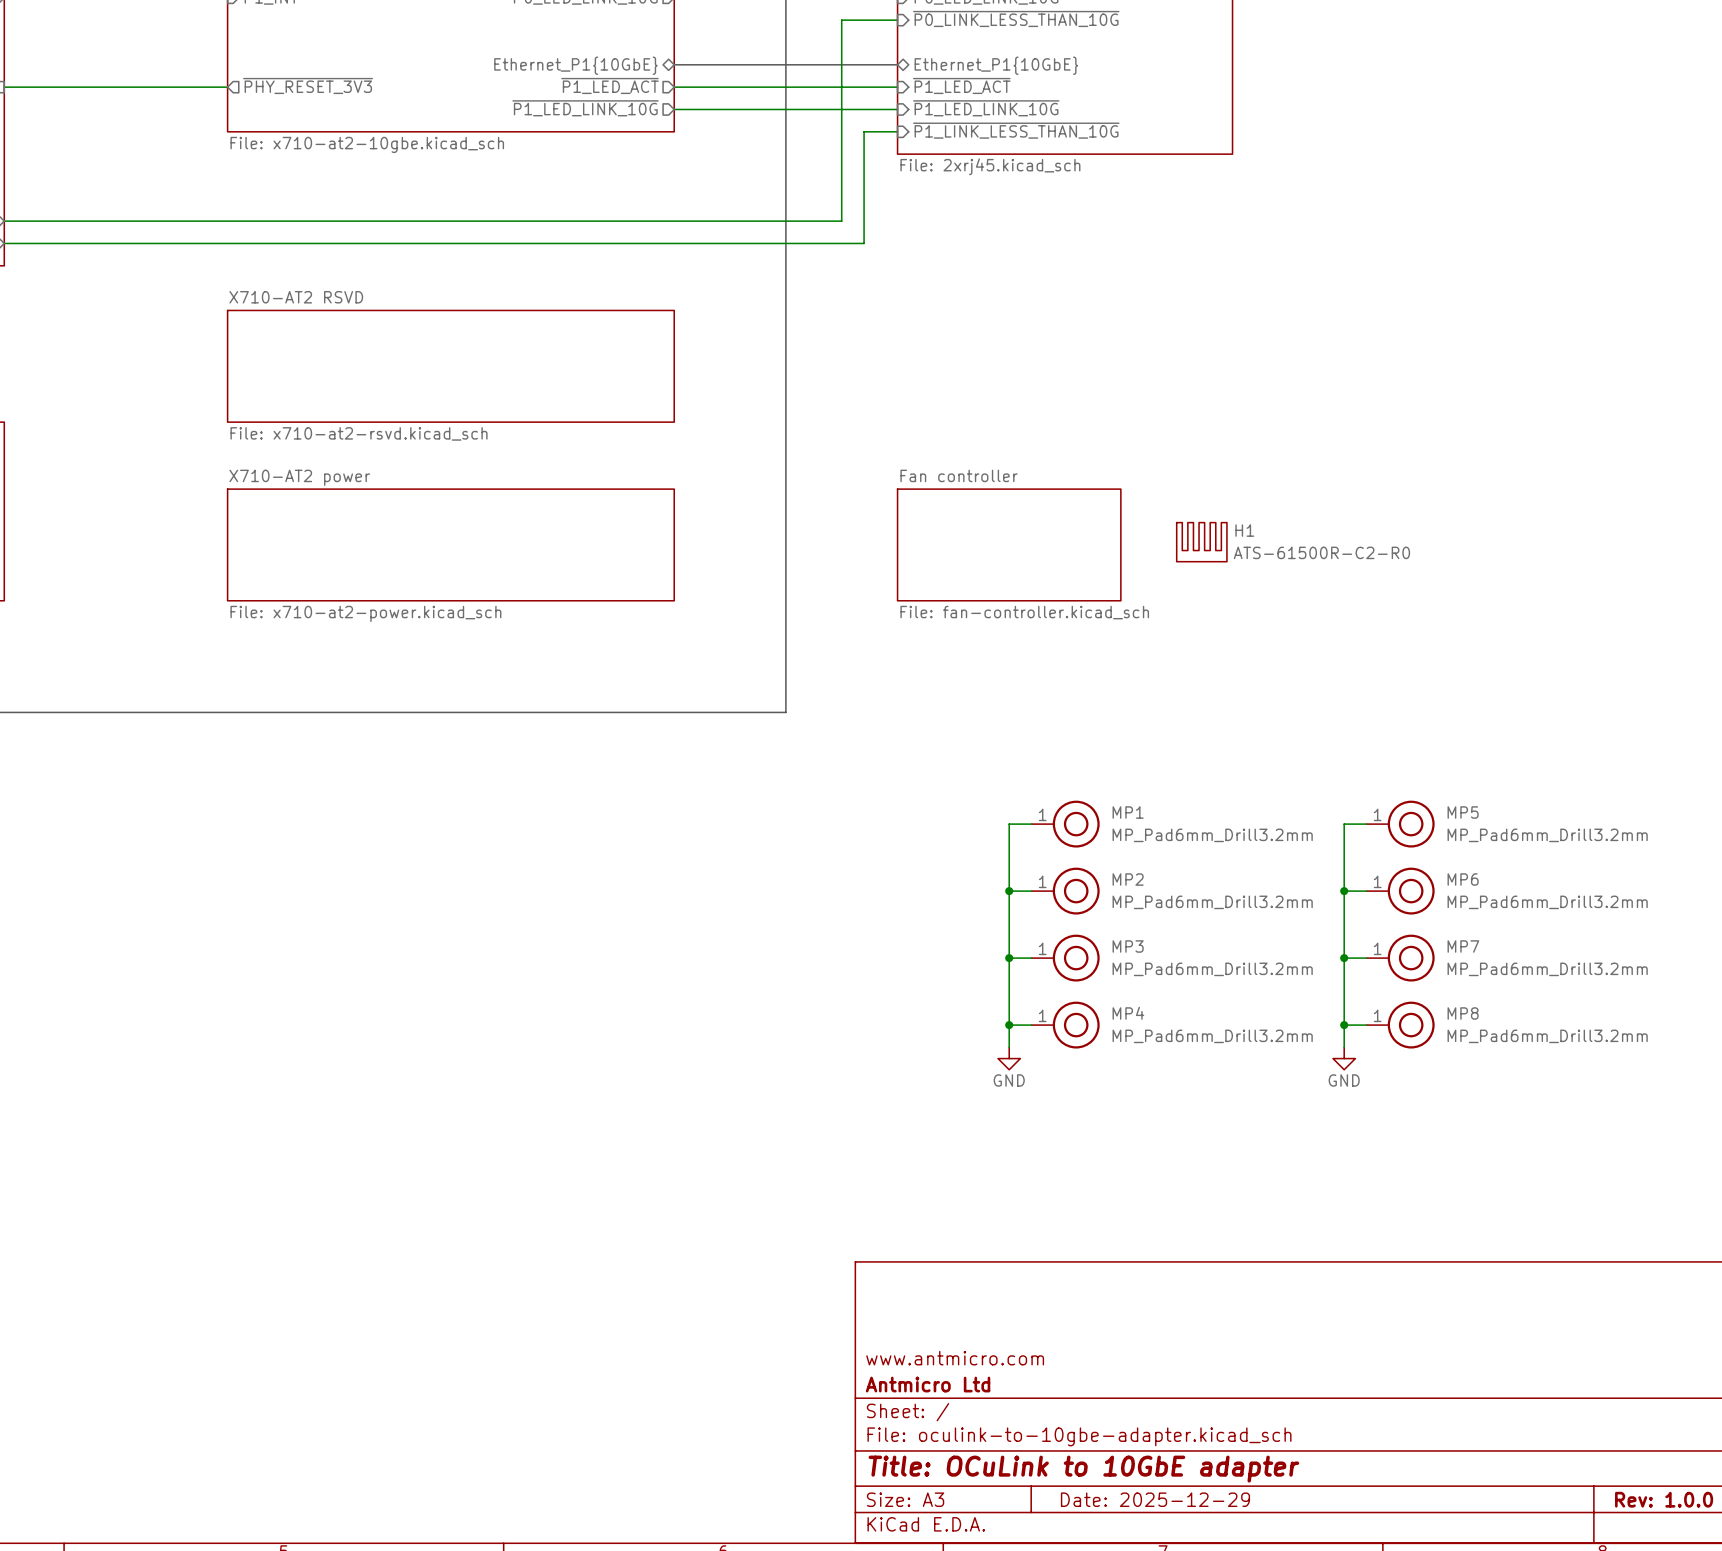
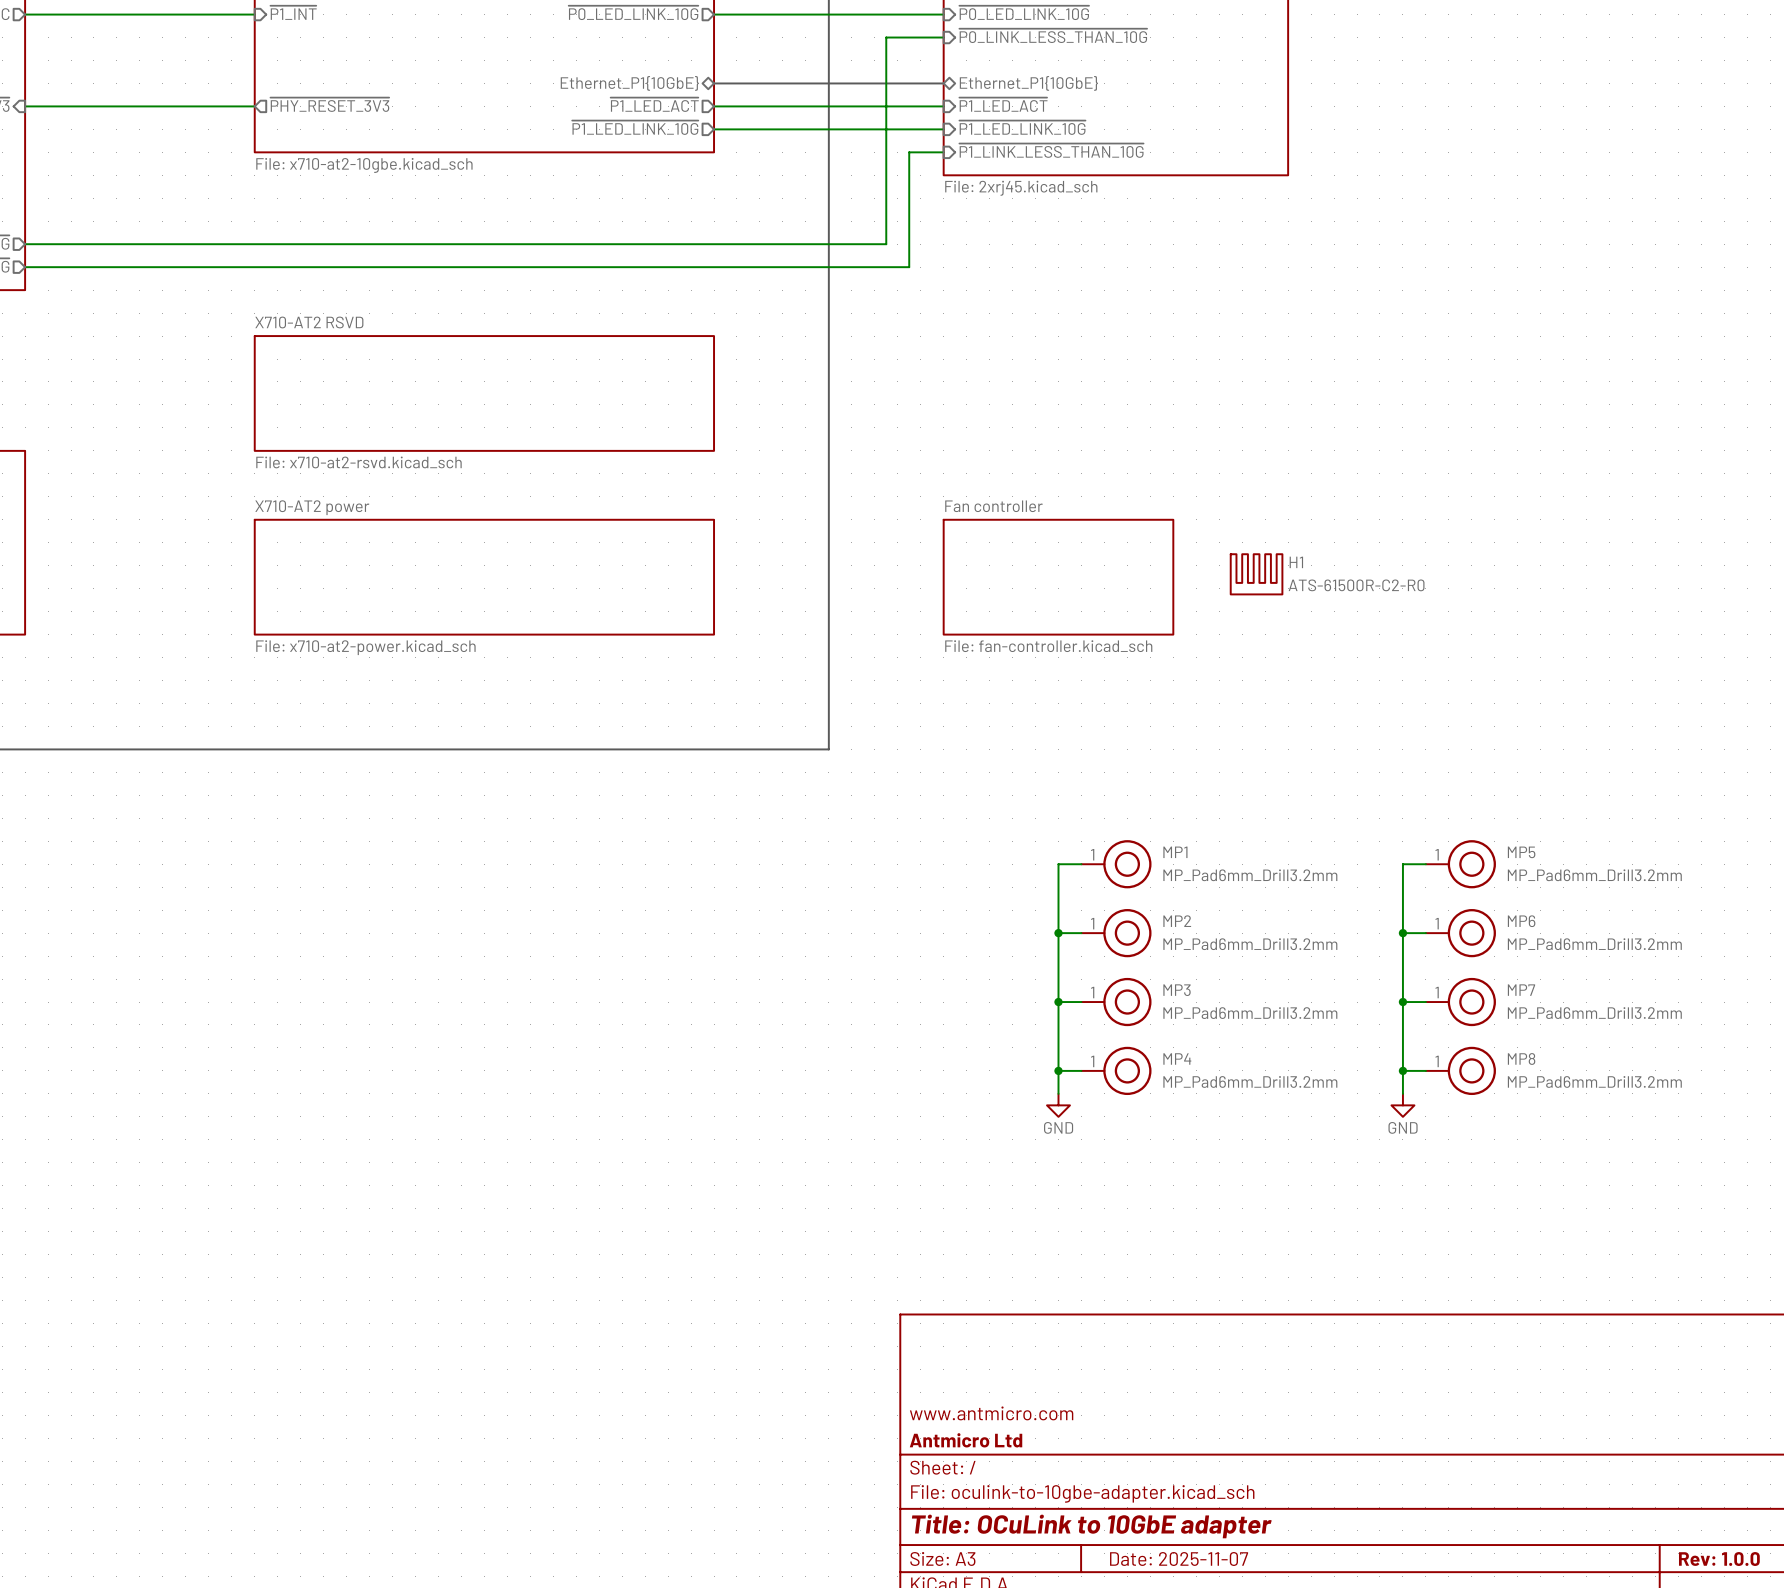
title block: Date: 2025-12-29 (1155, 1499) -> Date: 2025-11-07 (1179, 1558)

